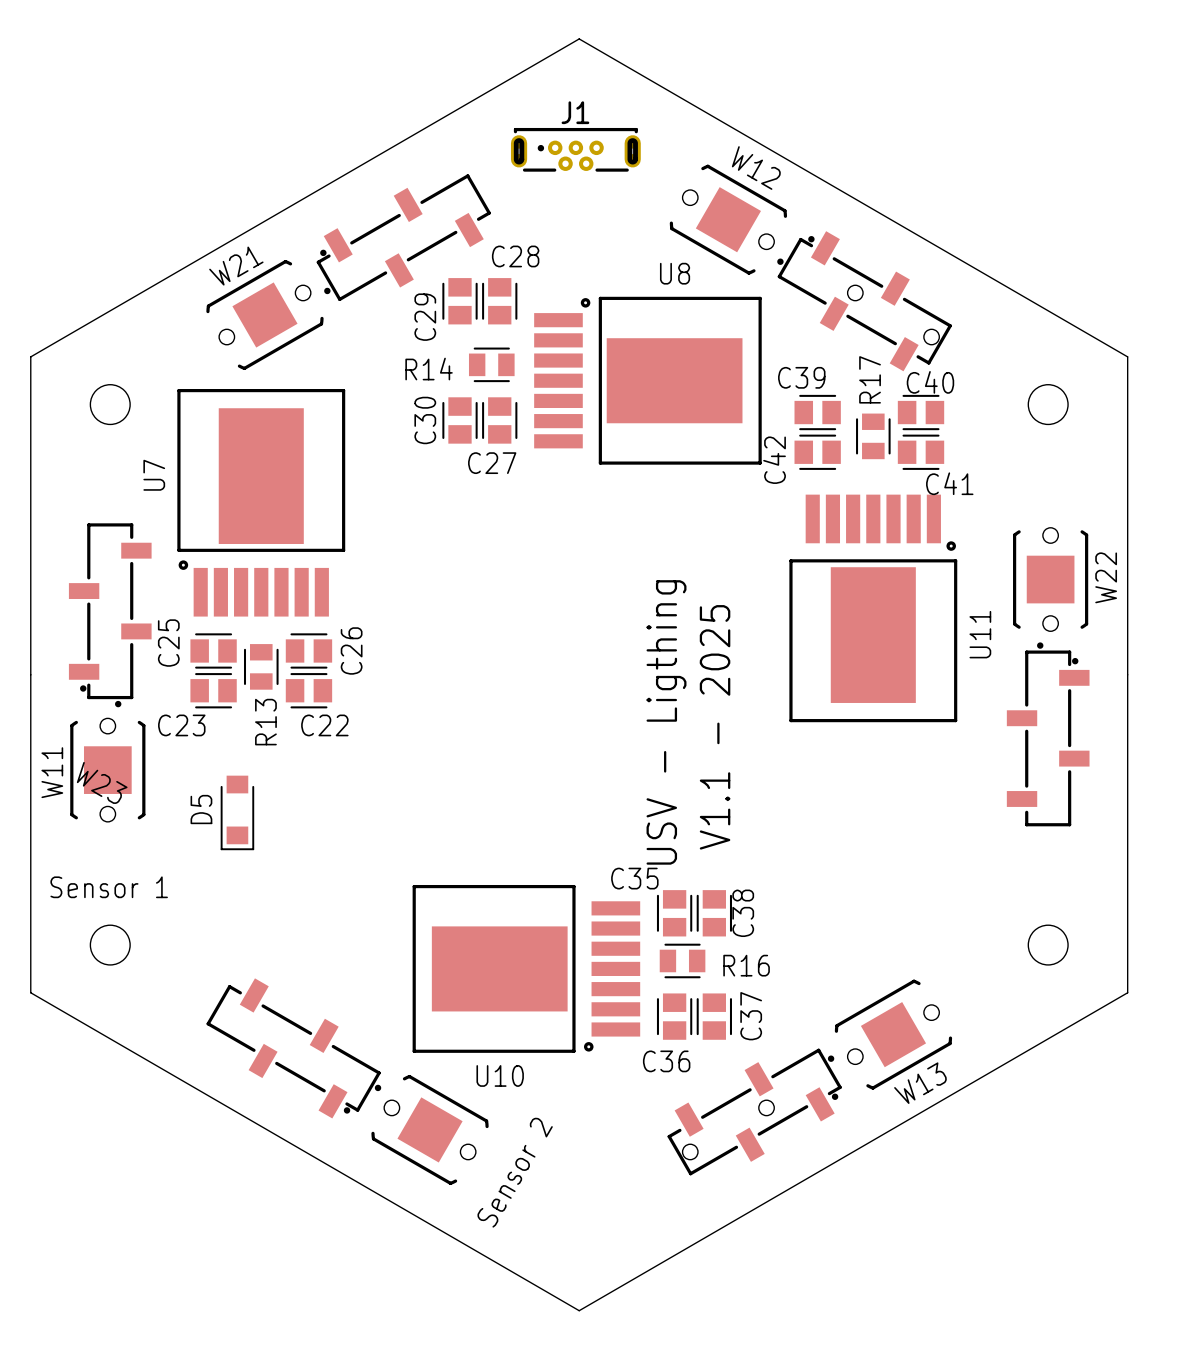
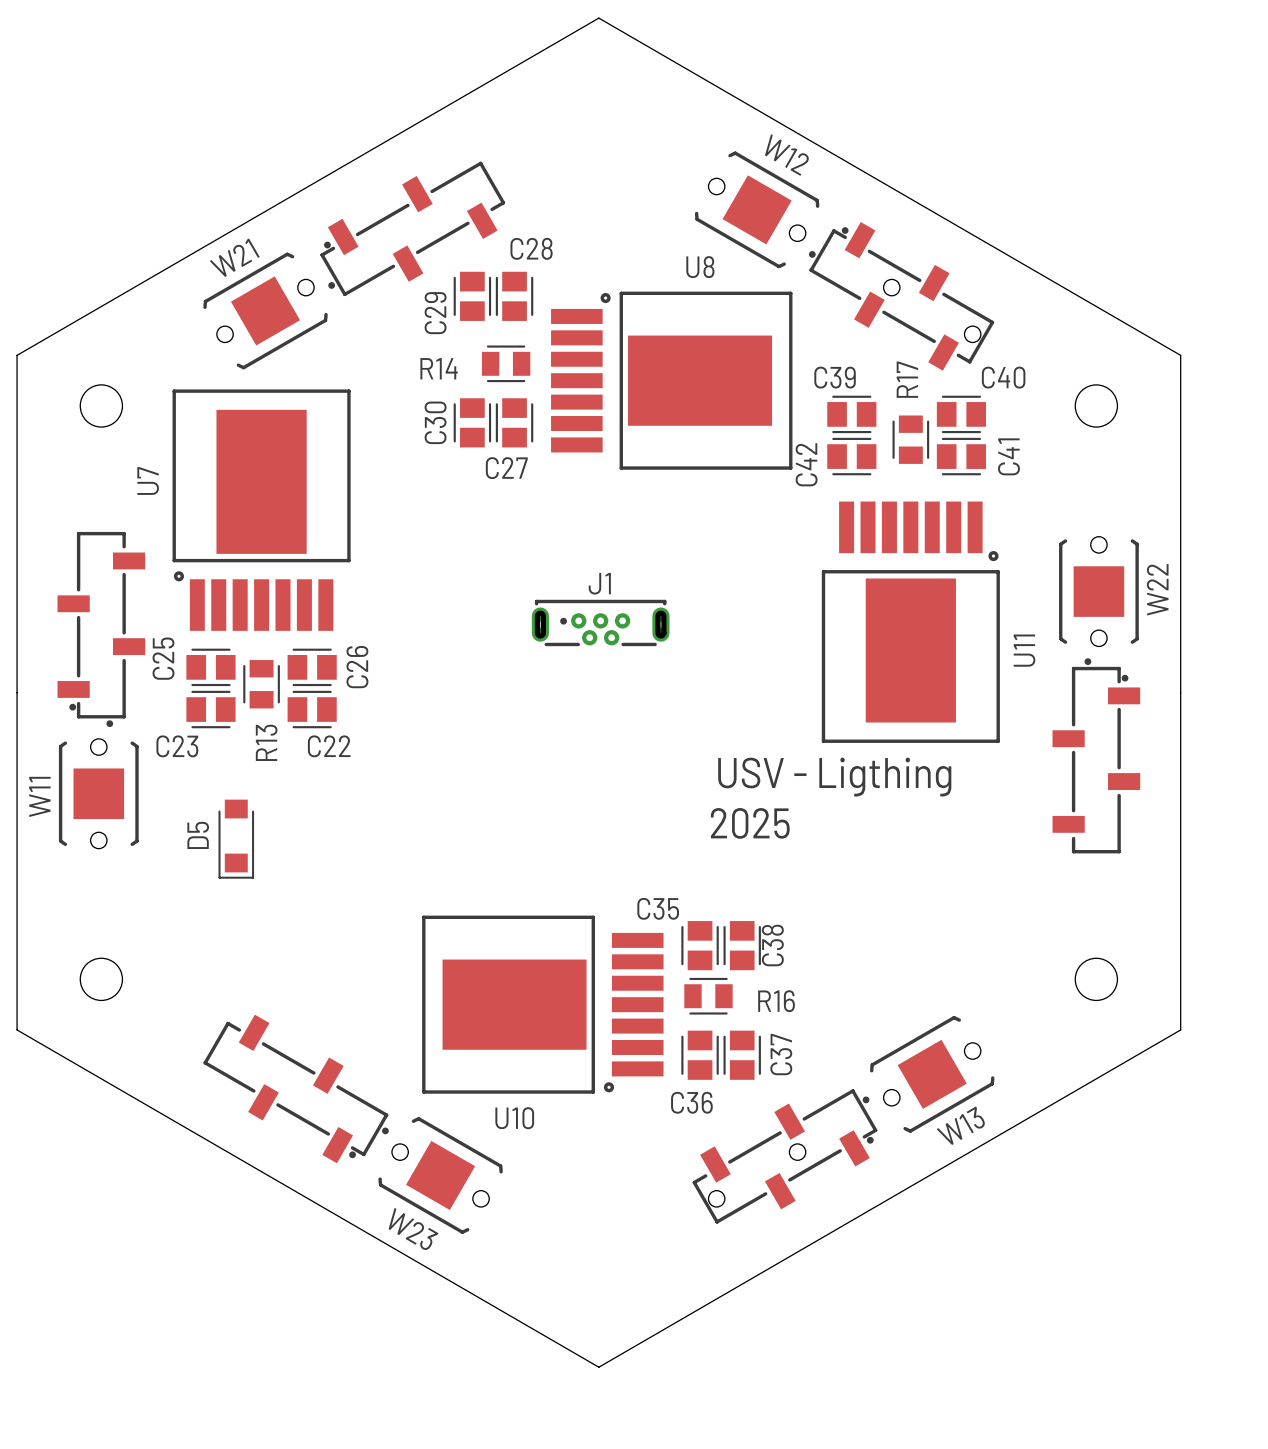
J1 position: (575, 149) -> (600, 622)
C40 name position: C40 (930, 382) -> C40 (1003, 377)
C41 name rotation: 0° (949, 483) -> 90° counterclockwise (1008, 456)
text rotation: 0° (666, 722) -> 90° clockwise (834, 777)
text: V1.1 - 2025 (715, 727) -> none
W23 name position: W23 (102, 782) -> W23 (413, 1229)
text: none -> 2025 (750, 823)
text: Sensor 1 (109, 887) -> none
text: Sensor 2 (515, 1172) -> none

